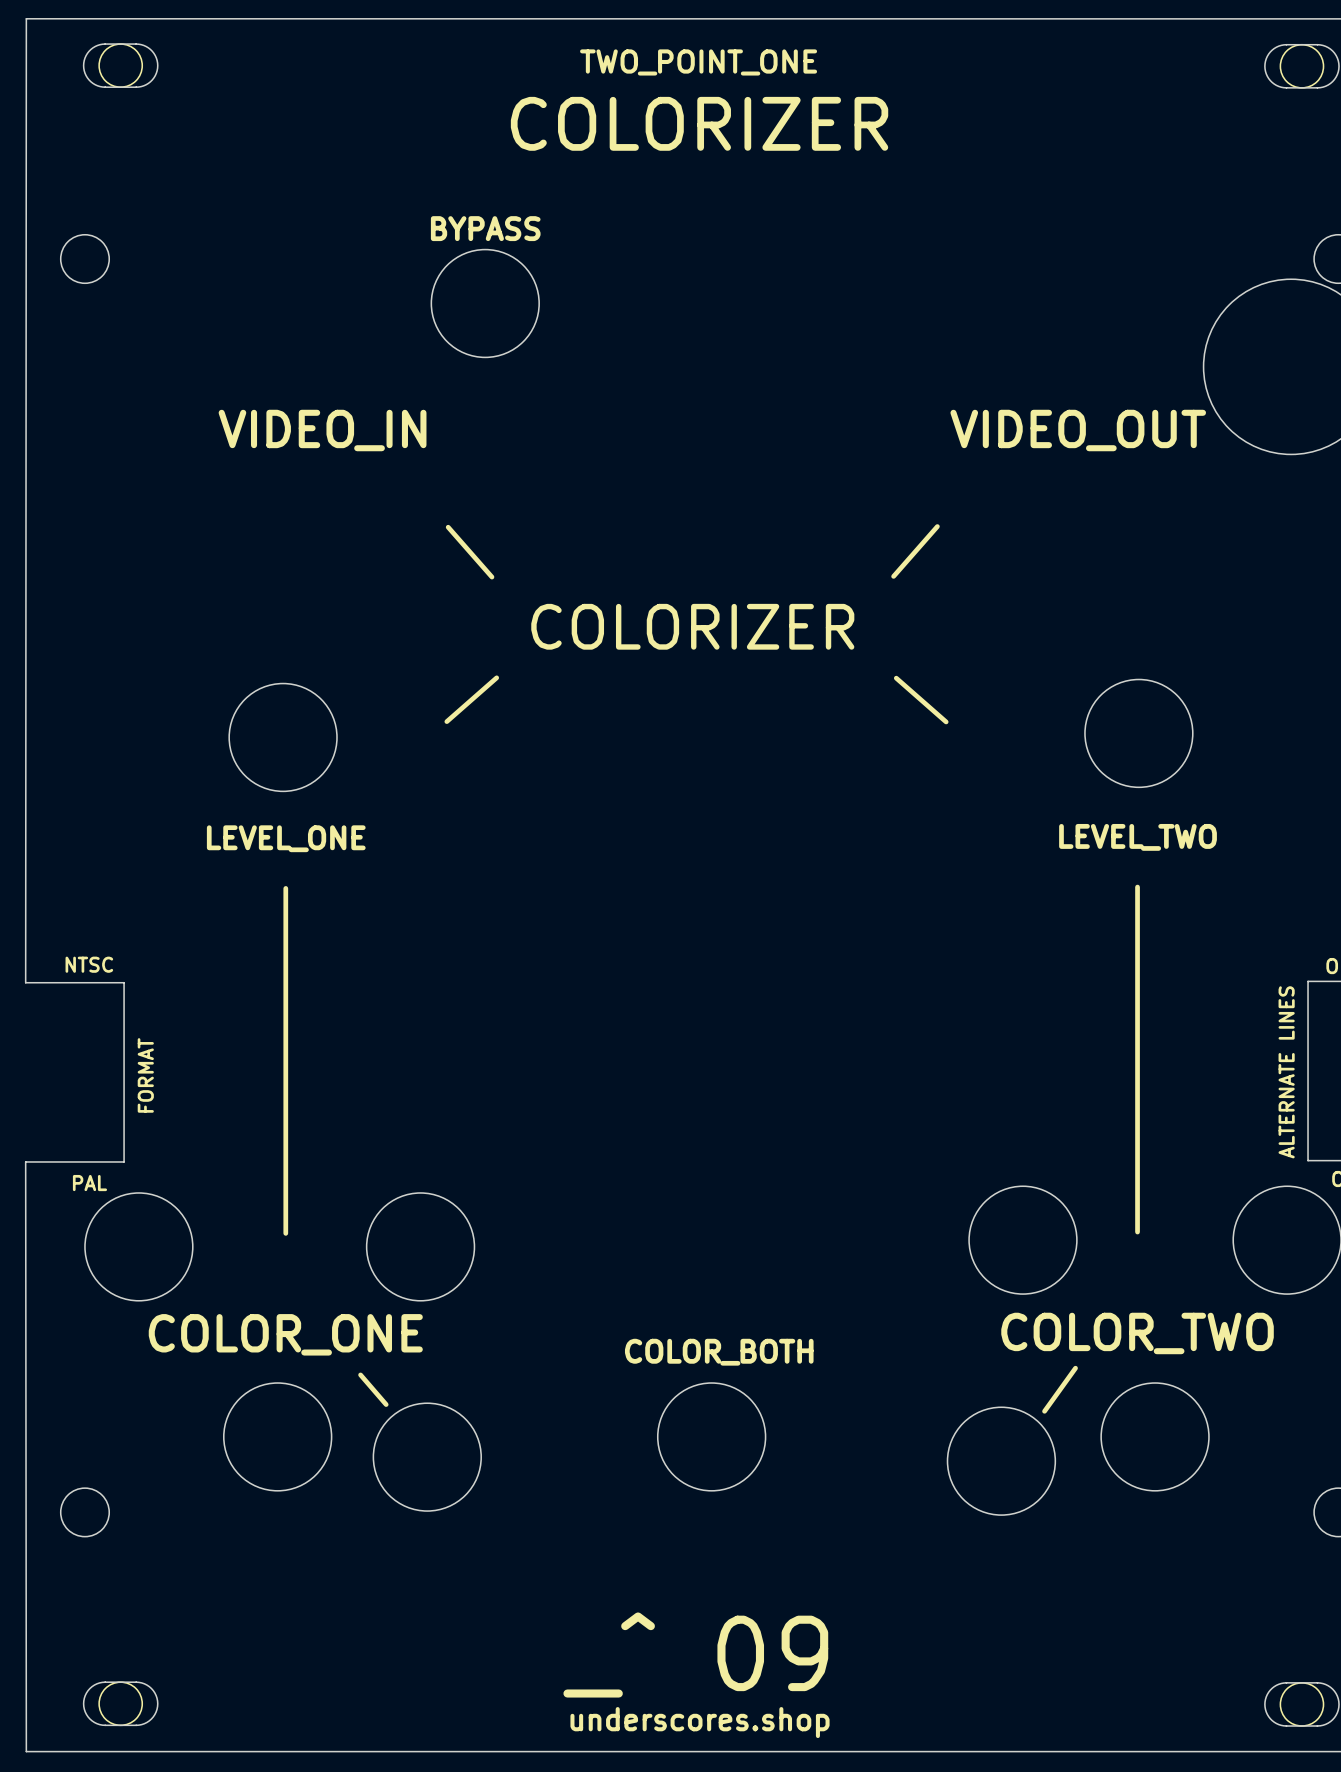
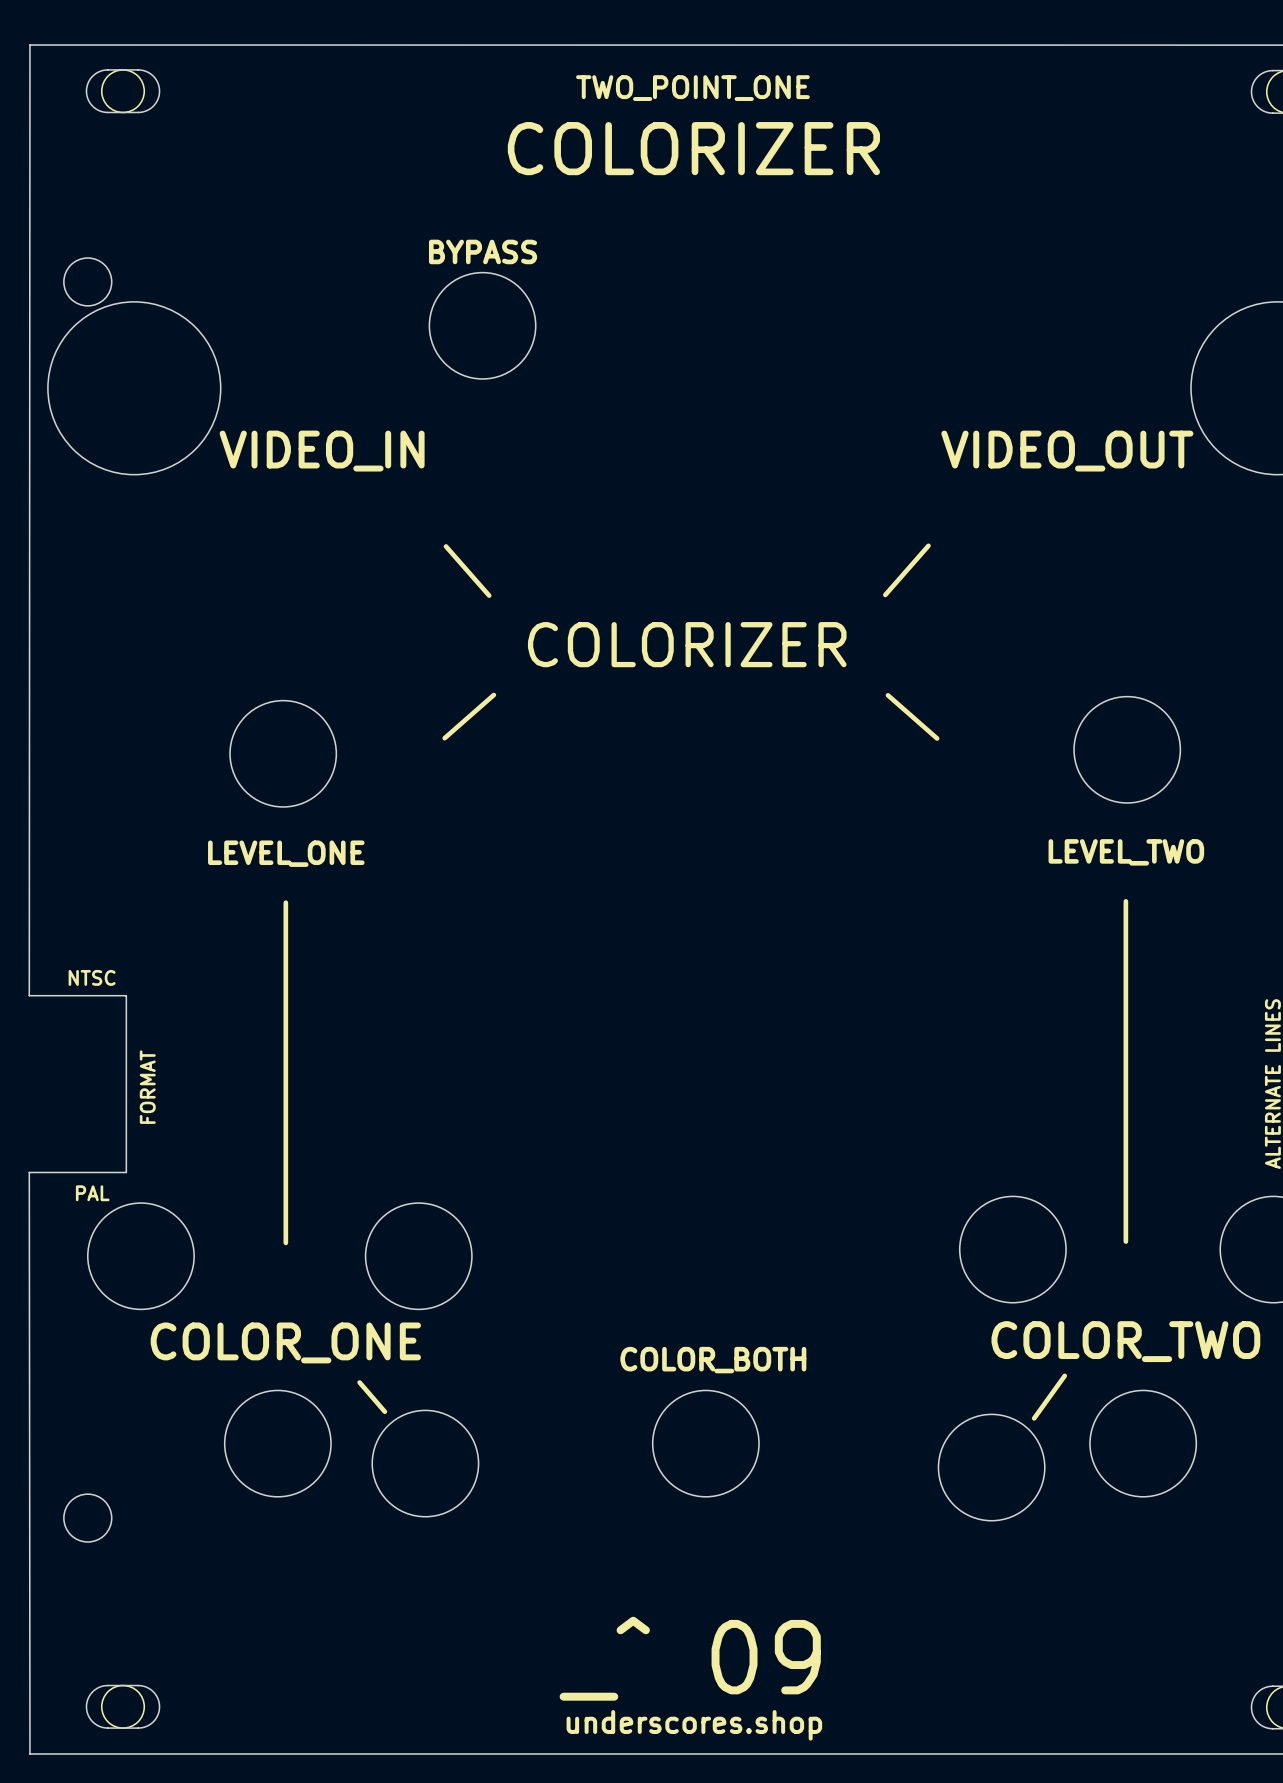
round board edge: none -> [47, 301, 222, 476]

